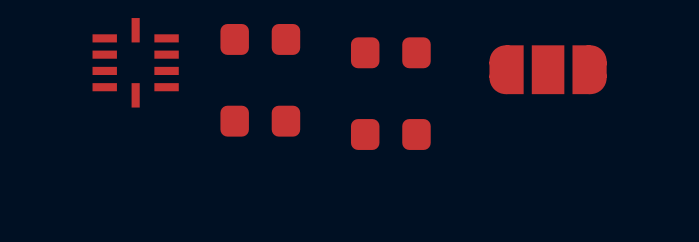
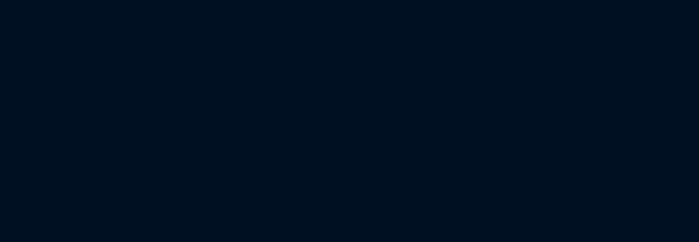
part: (260, 39) -> none
part: (390, 52) -> none
part: (135, 62) -> none
part: (548, 69) -> none
part: (260, 121) -> none
part: (390, 134) -> none

